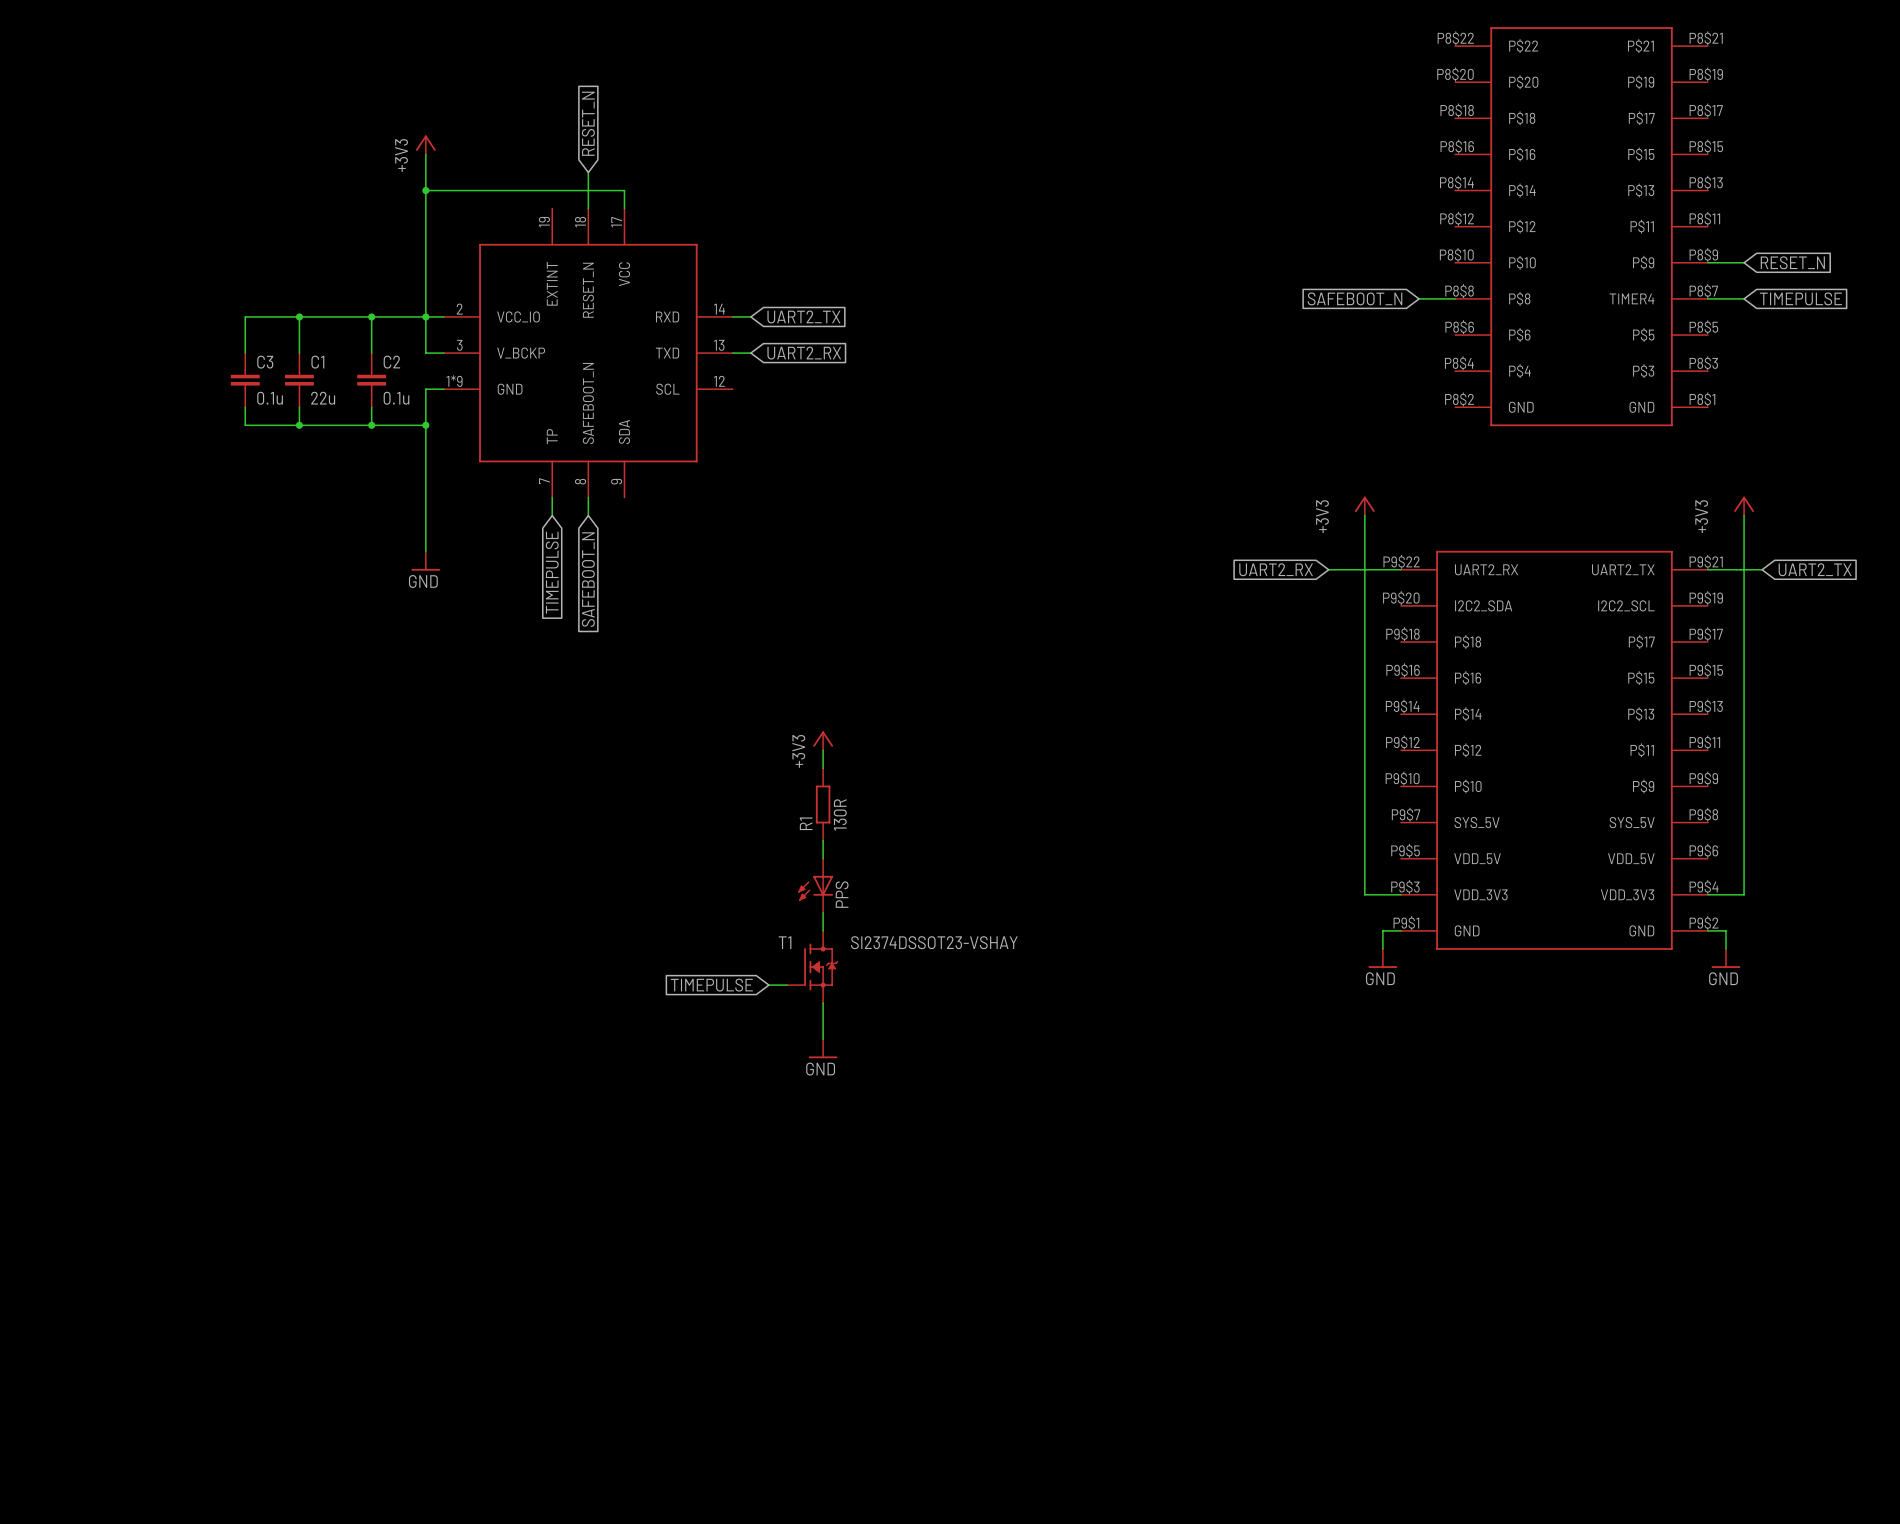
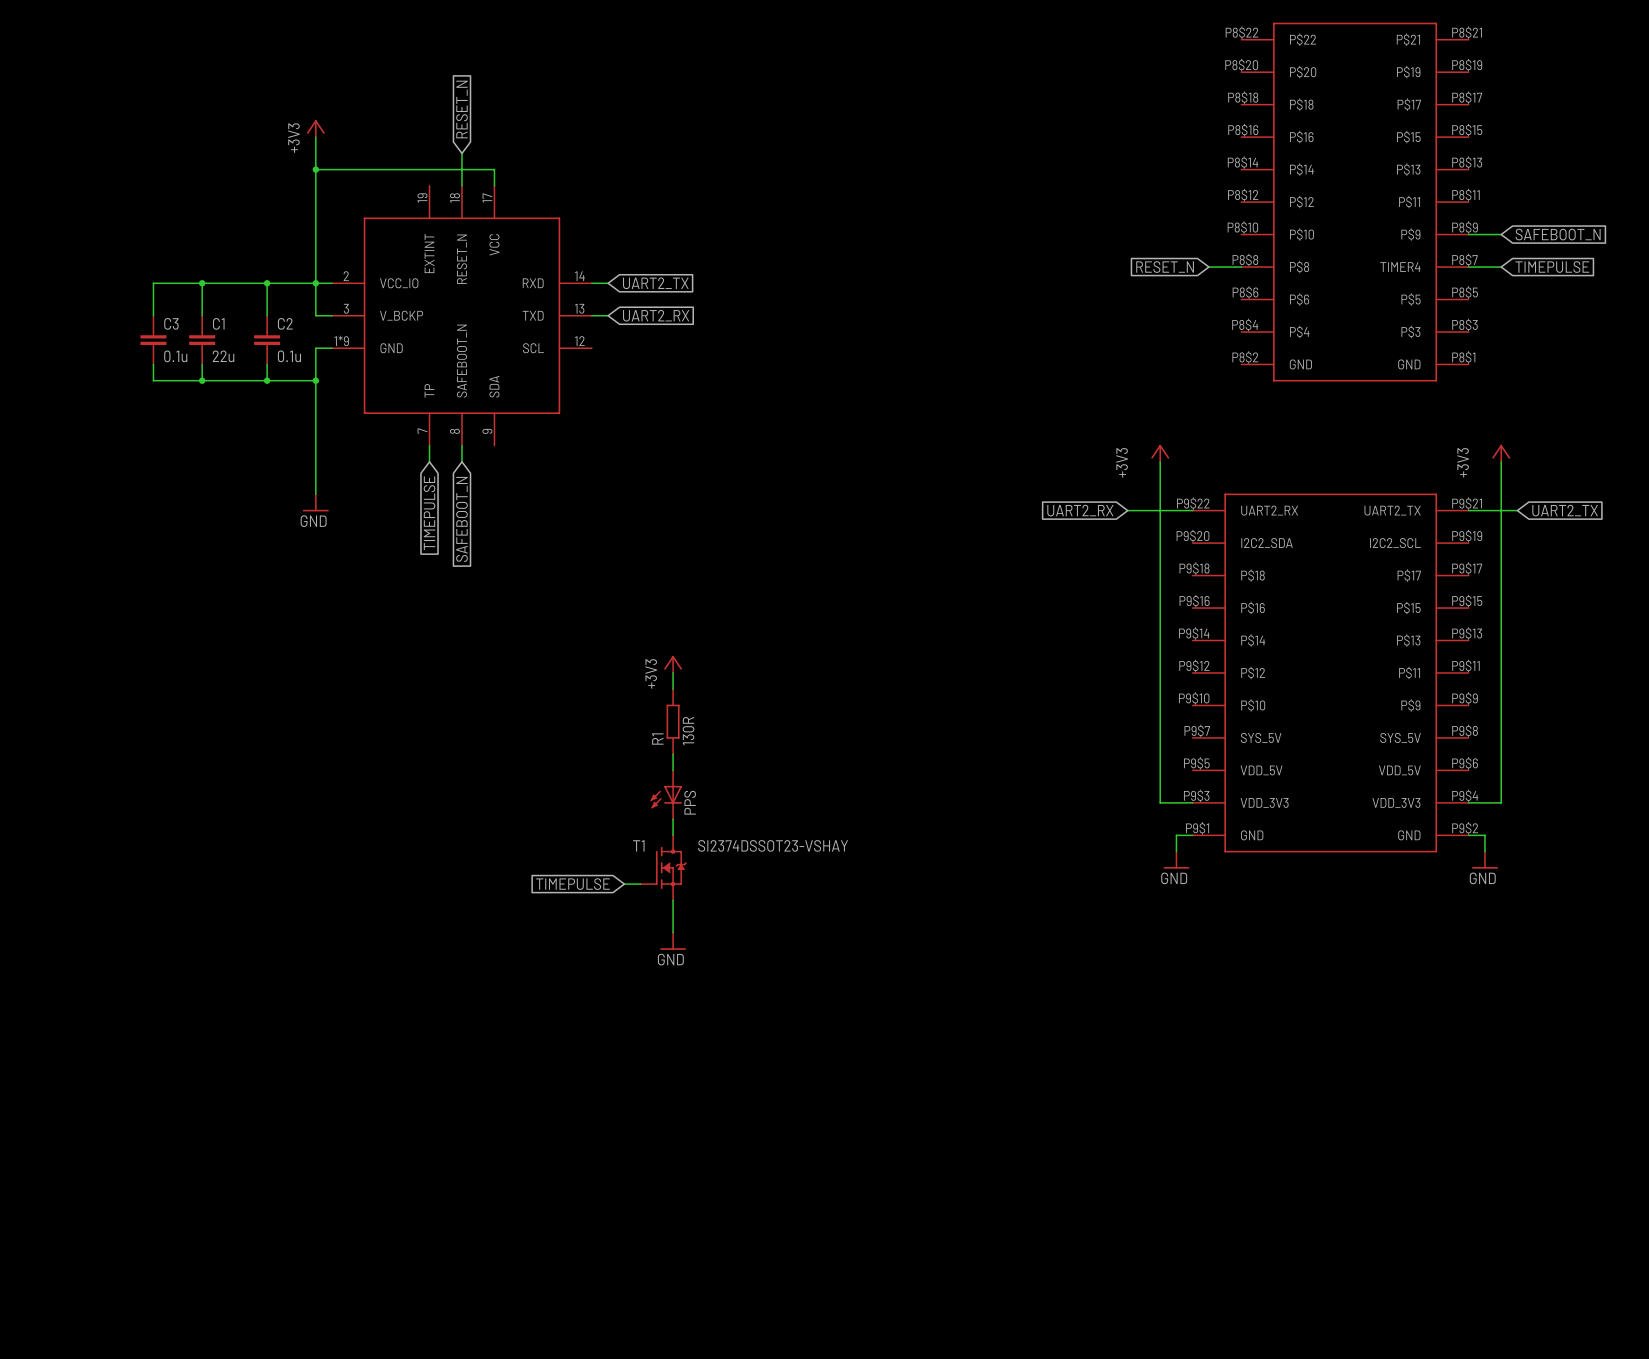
global label: RESET_N (1792, 262) -> SAFEBOOT_N (1558, 234)
global label: SAFEBOOT_N (1355, 298) -> RESET_N (1165, 267)

